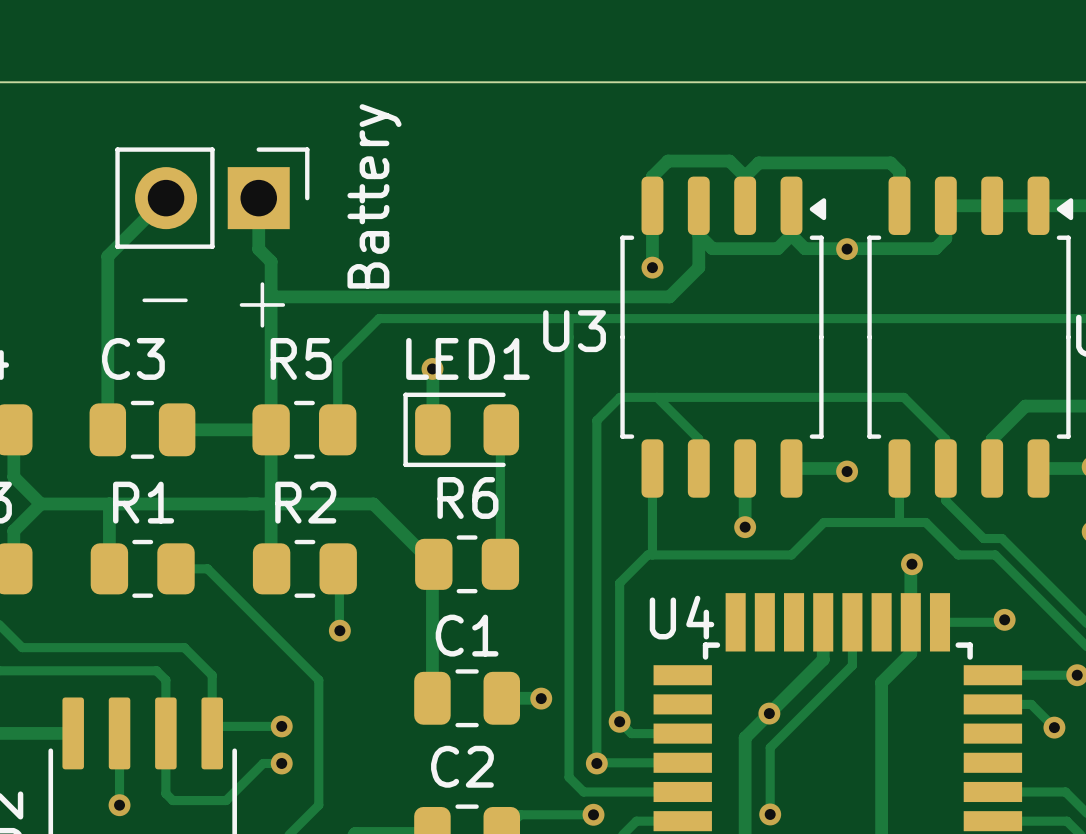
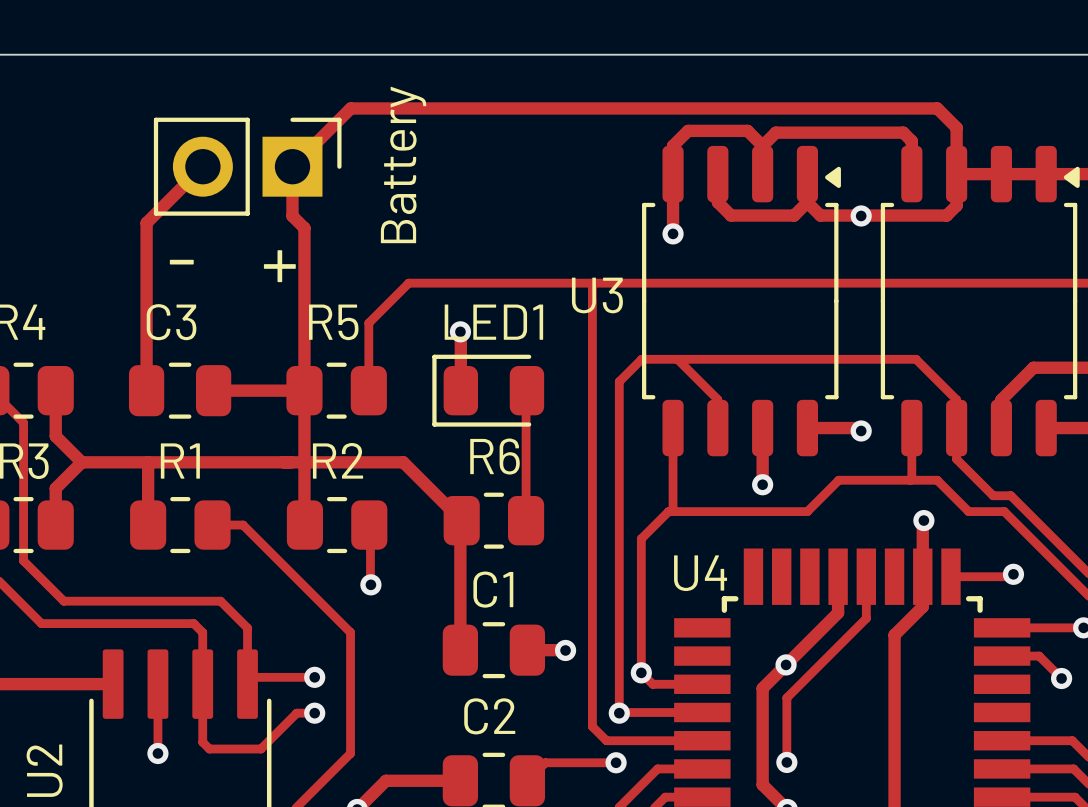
track: none -> (292, 166) (350, 108) (937, 108) (956, 127) (956, 174)
track: (698, 234) (698, 267) (669, 296) (272, 296) -> none

